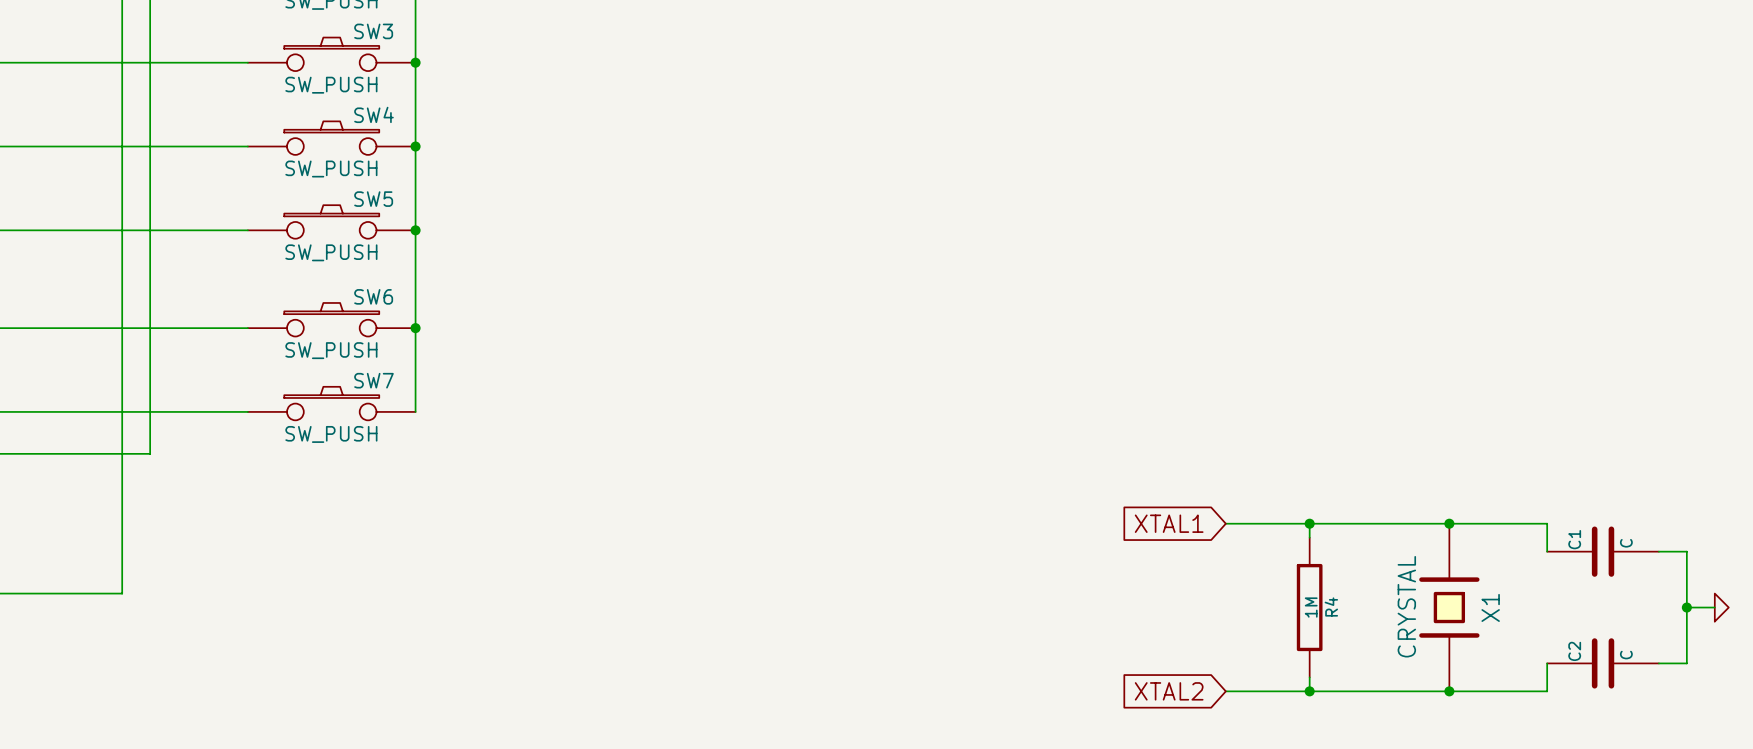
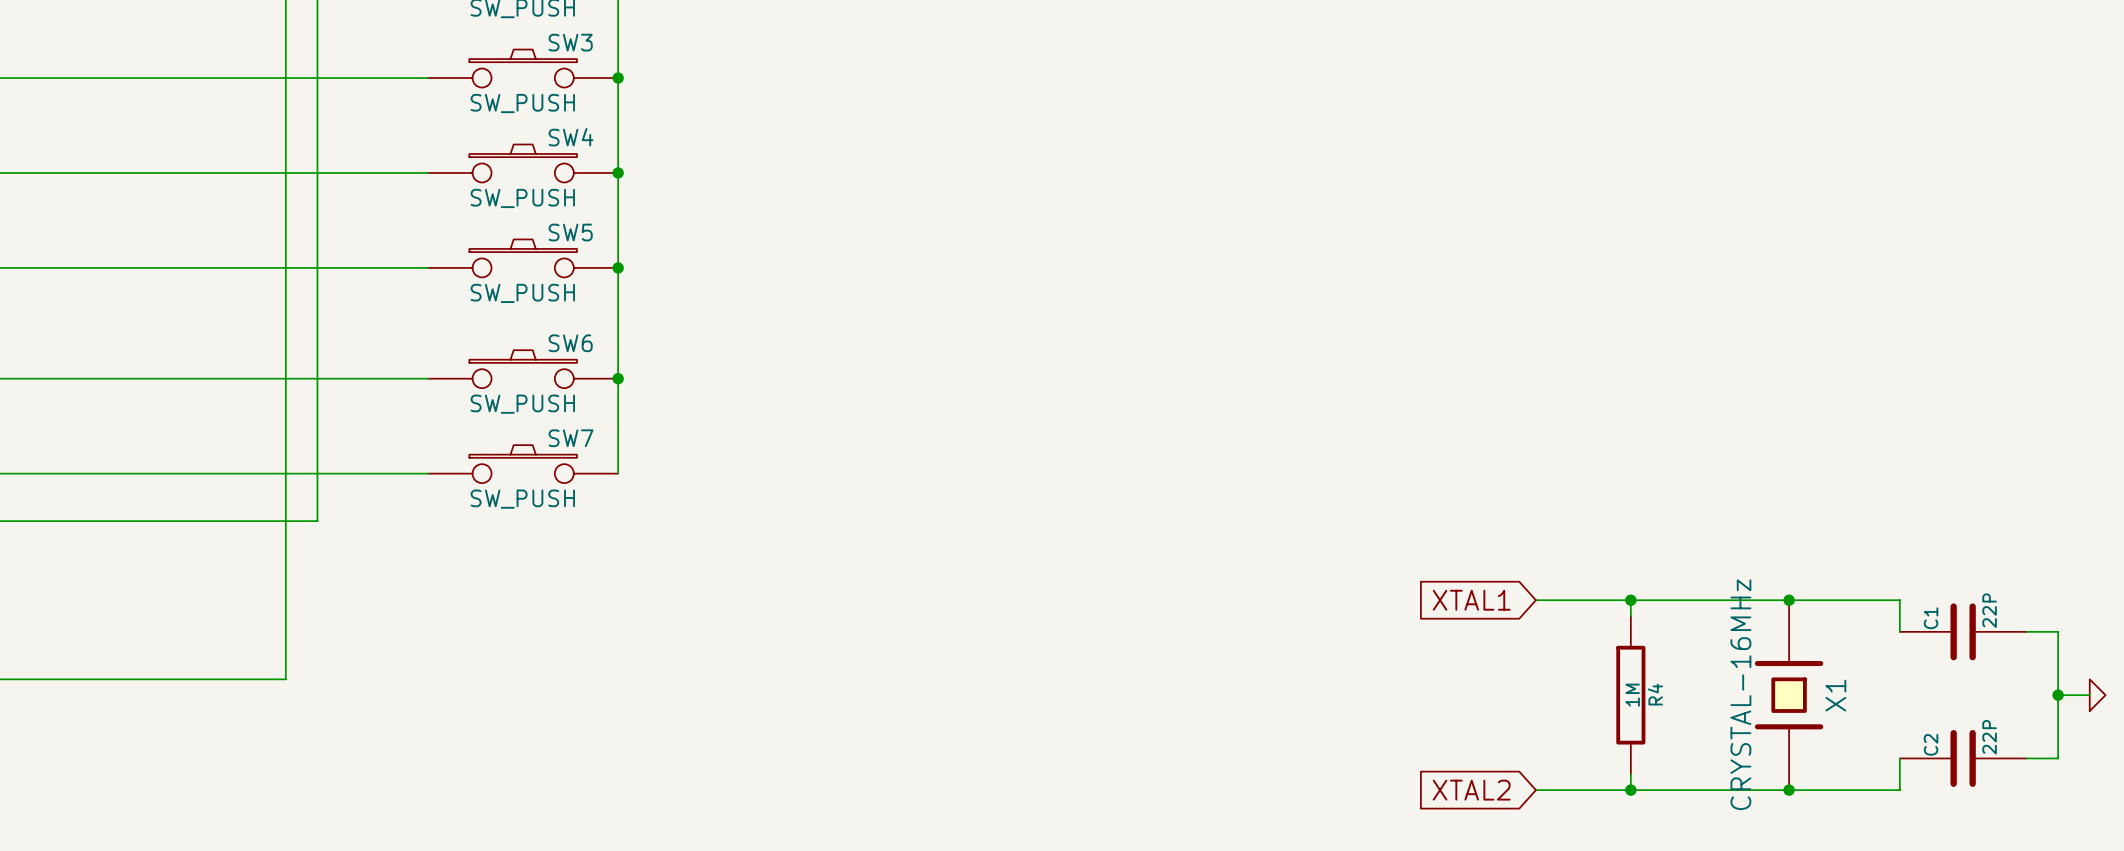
C1 value: C (1626, 543) -> 22P (1989, 610)
X1 value: CRYSTAL (1406, 606) -> CRYSTAL-16MHz (1740, 694)
C2 value: C (1626, 655) -> 22P (1989, 737)

